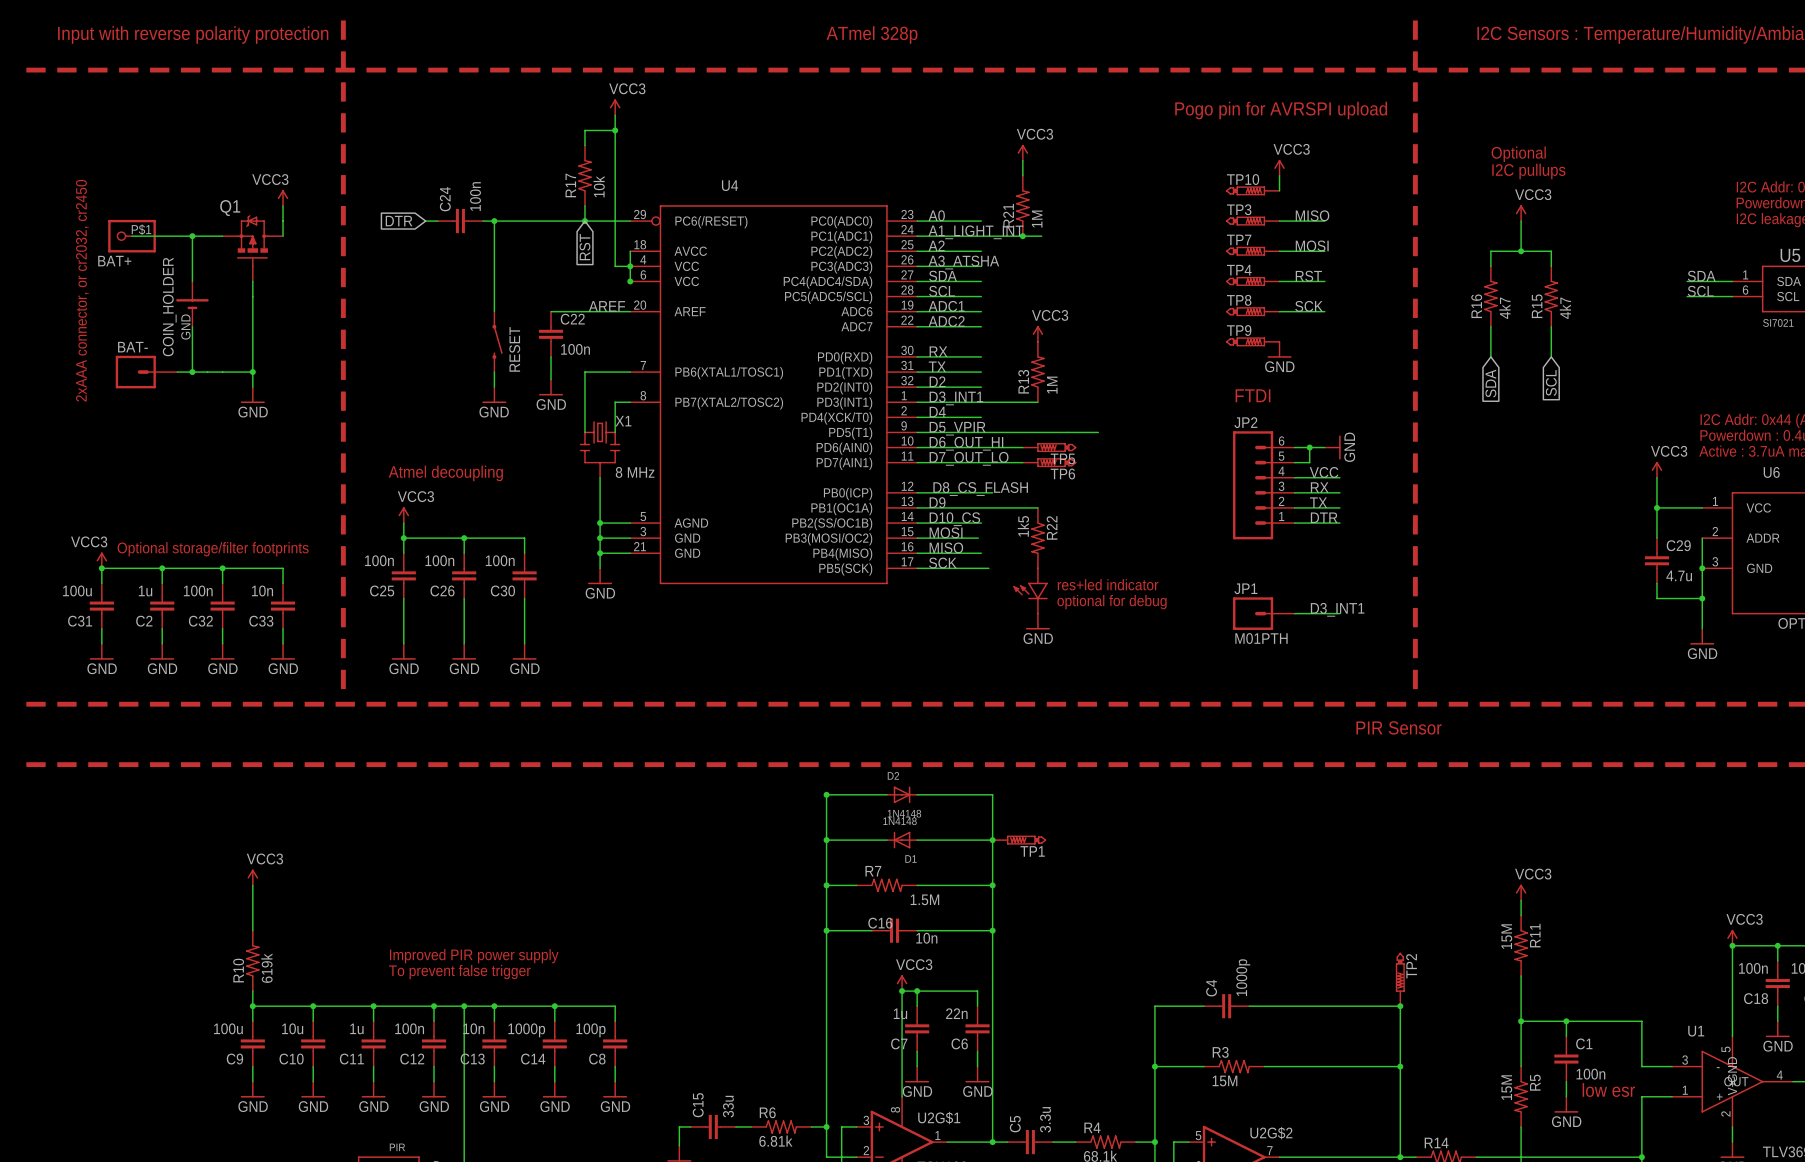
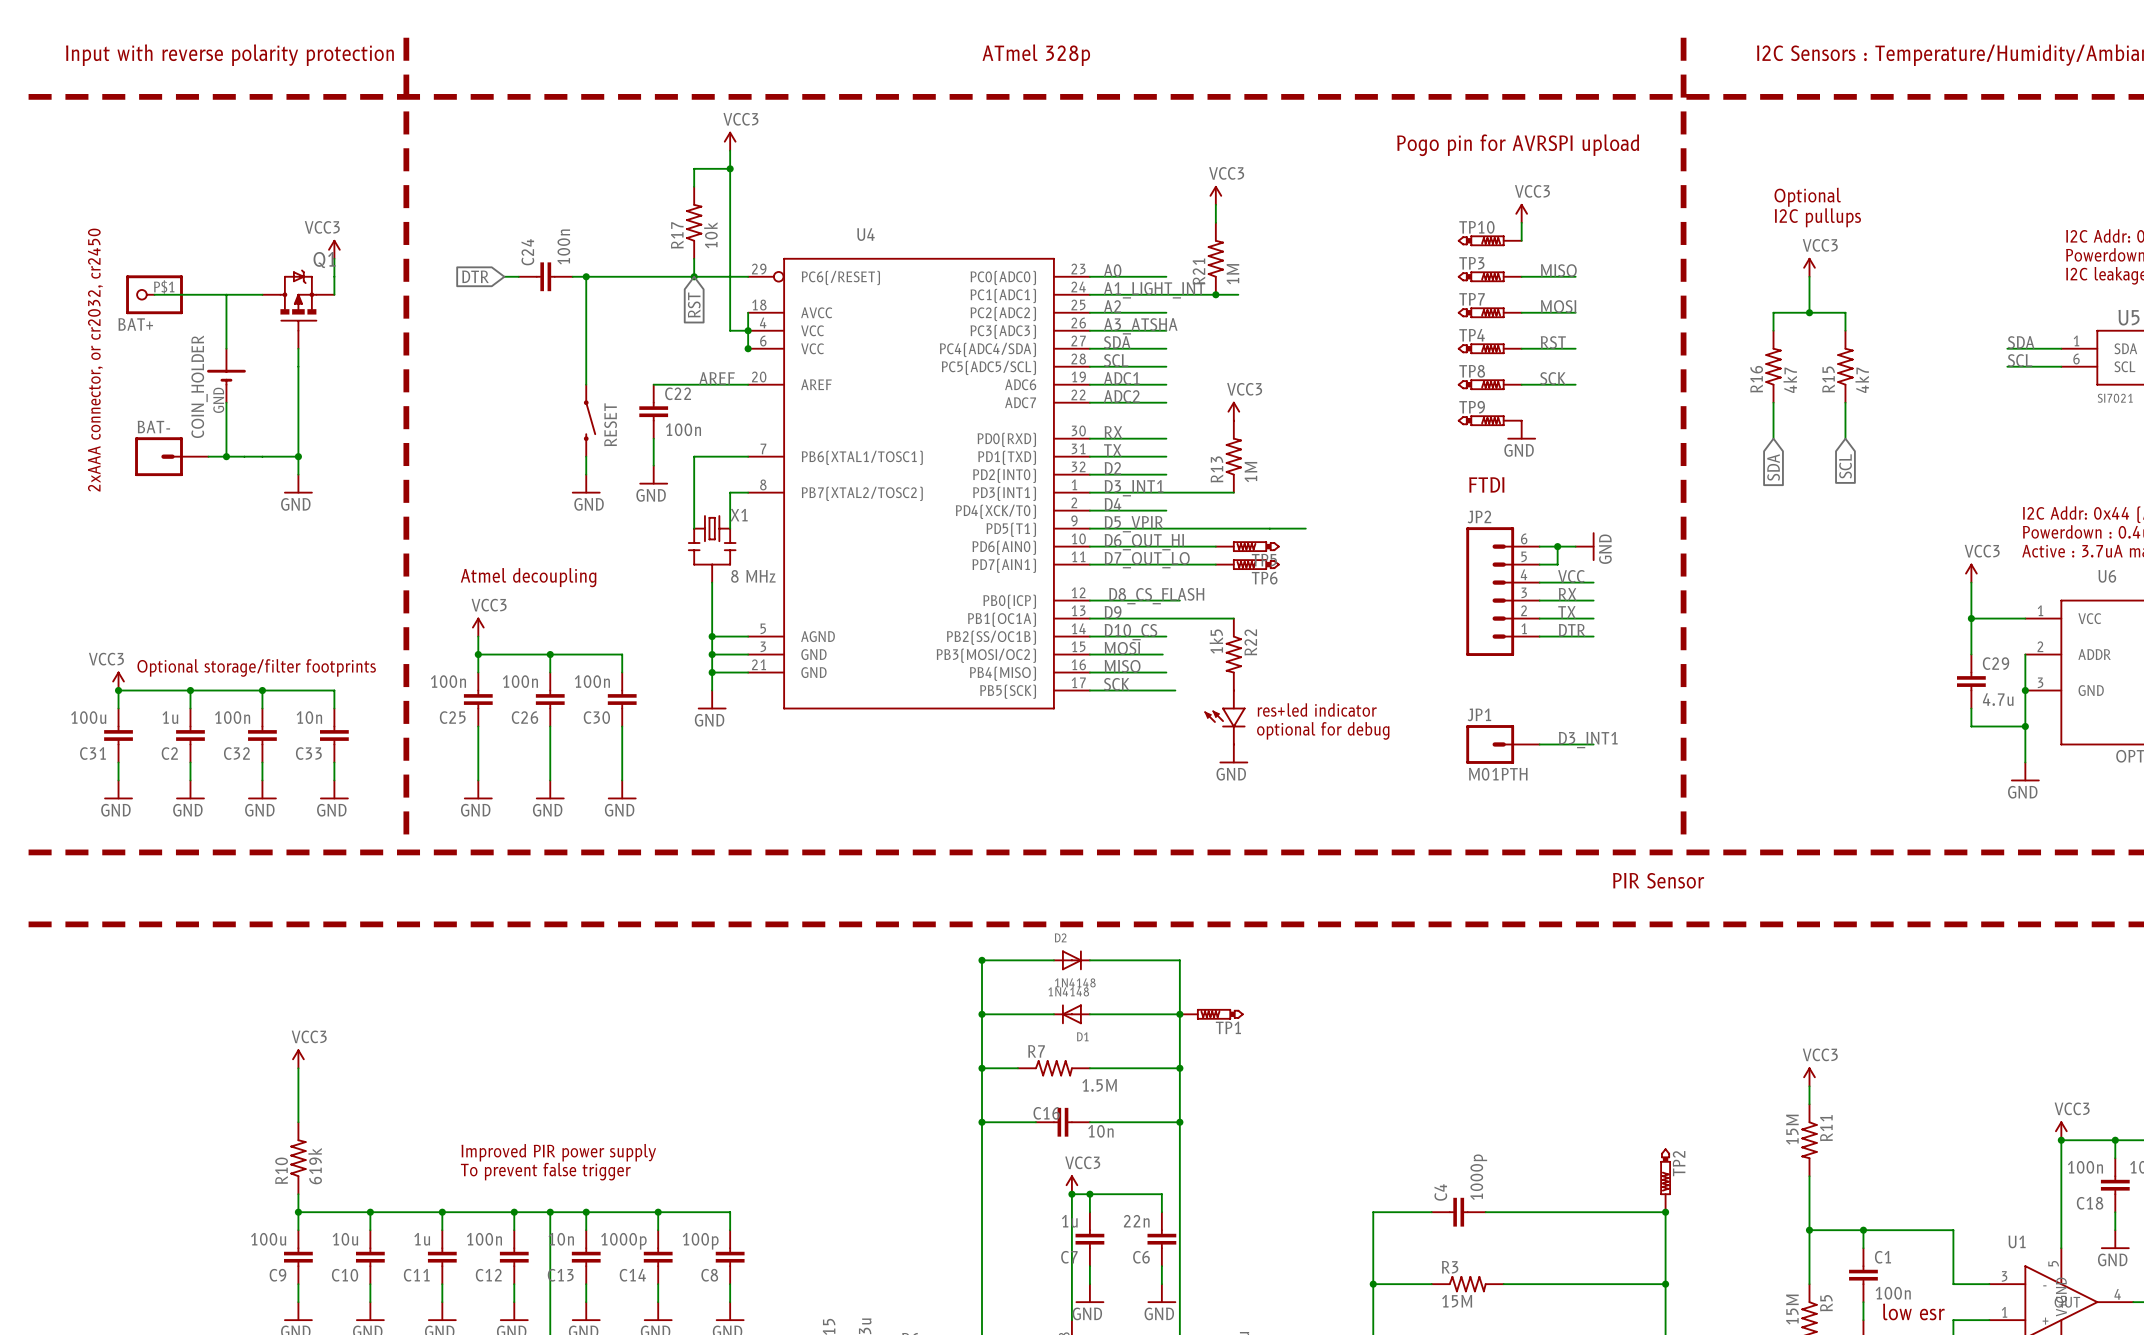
junction: (192, 236) -> none
Q1 flip: as is (252, 241) -> left-right (298, 300)

